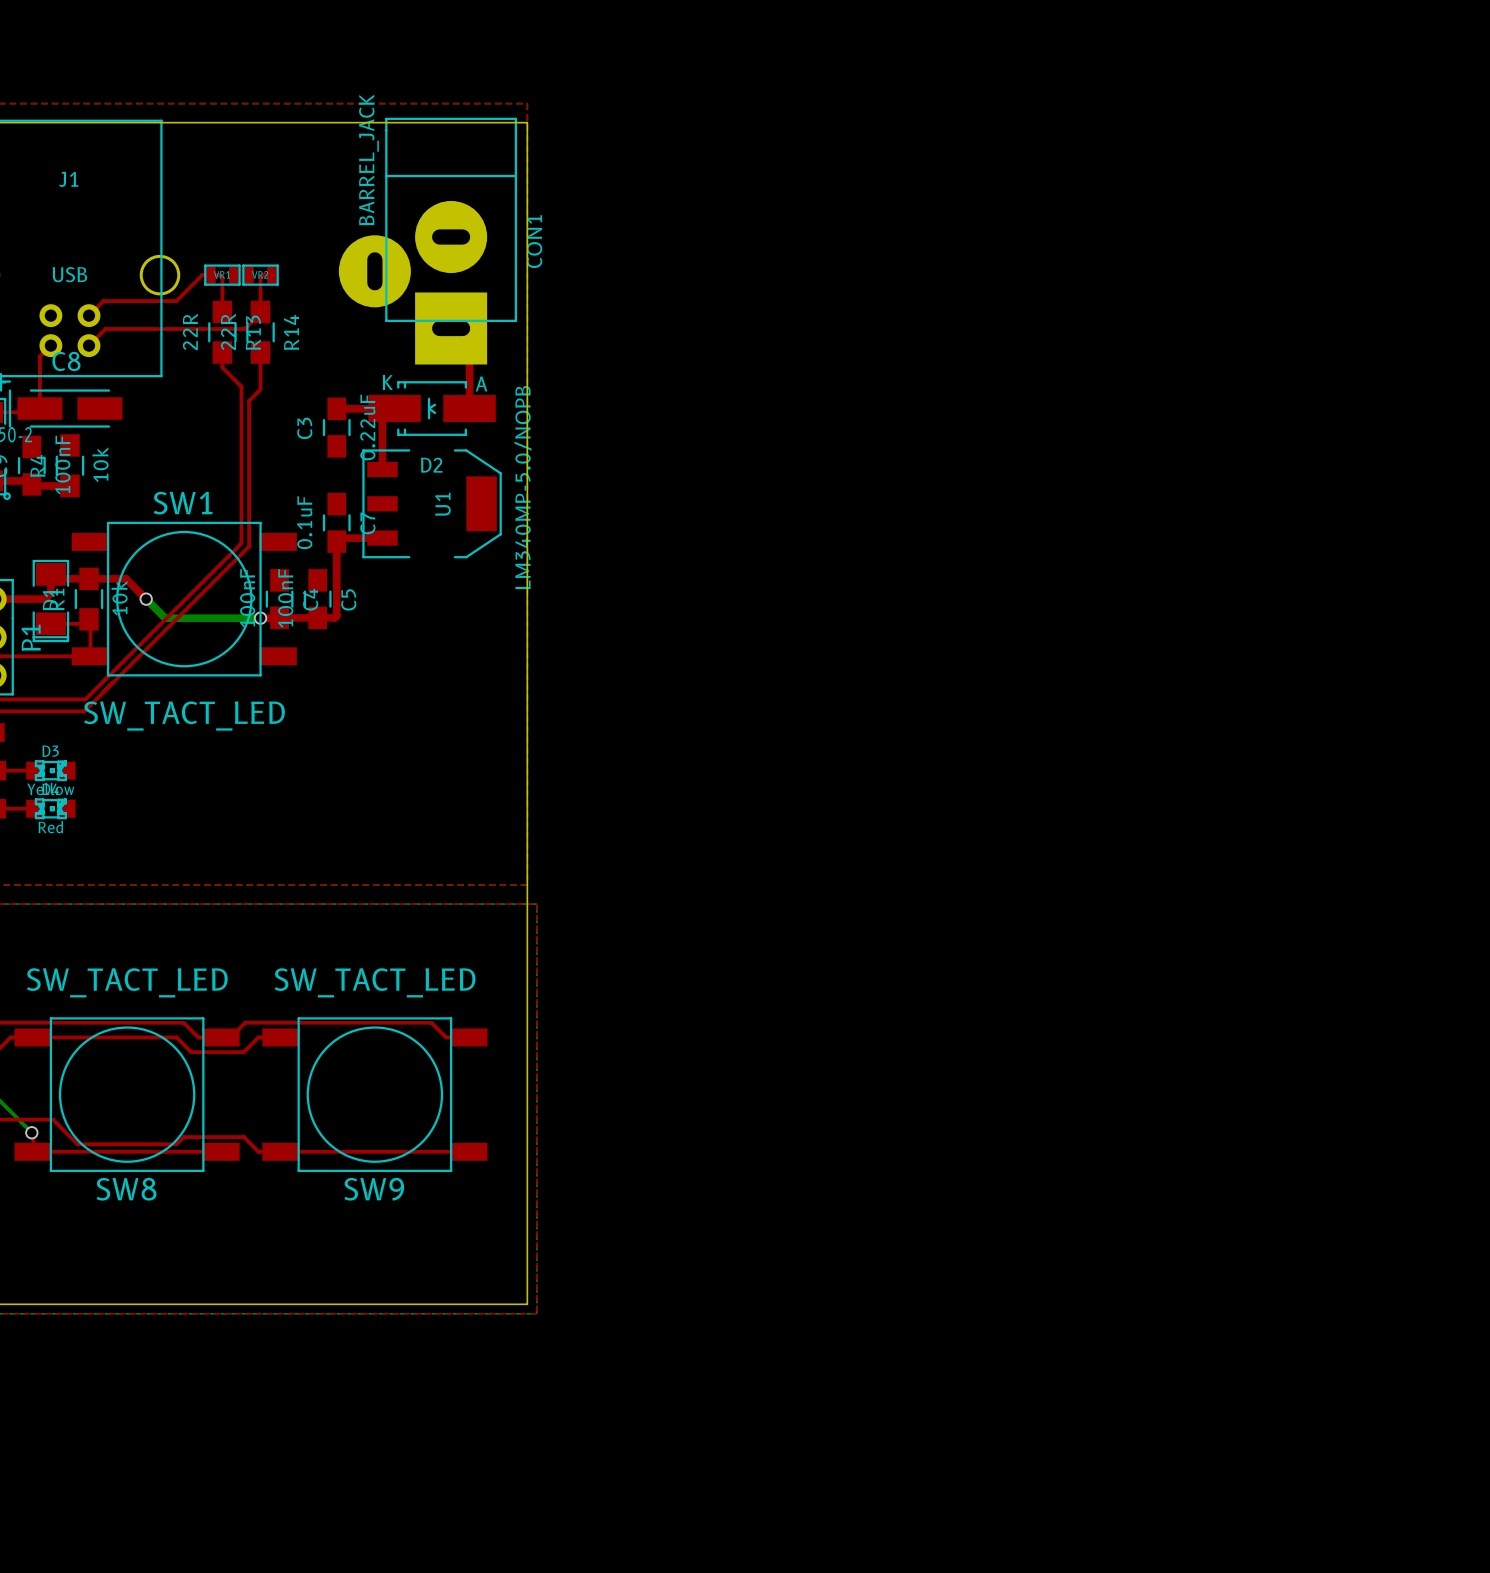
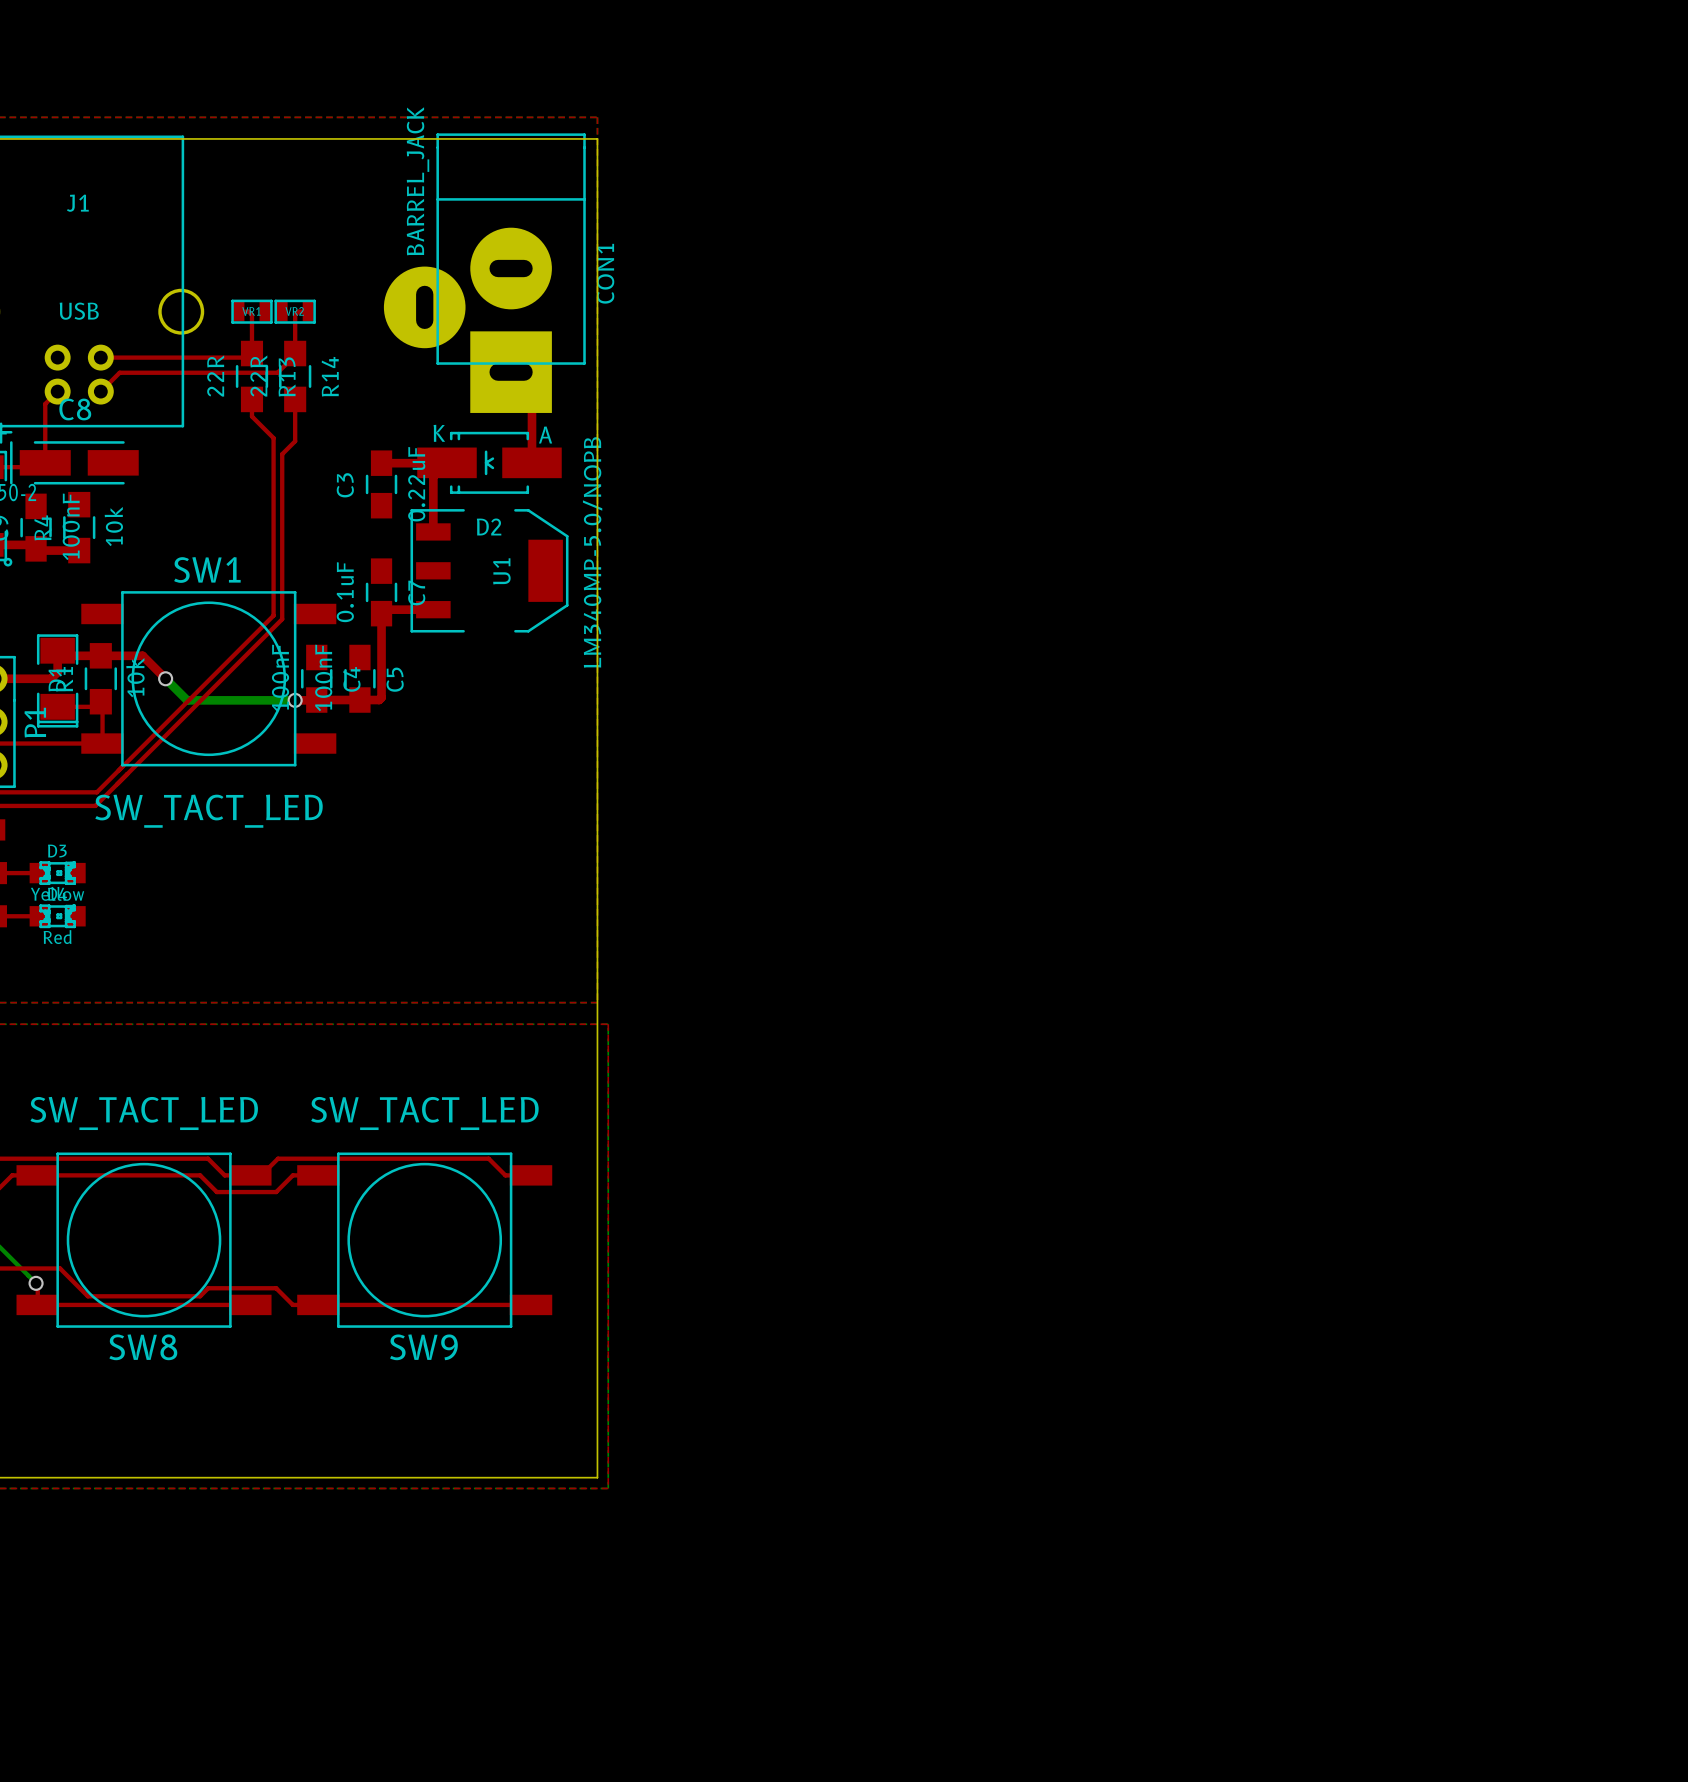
top track: (210, 275) (202, 275) (176, 301) (103, 301) (89, 315) -> (251, 353) (247, 357) (100, 357)

